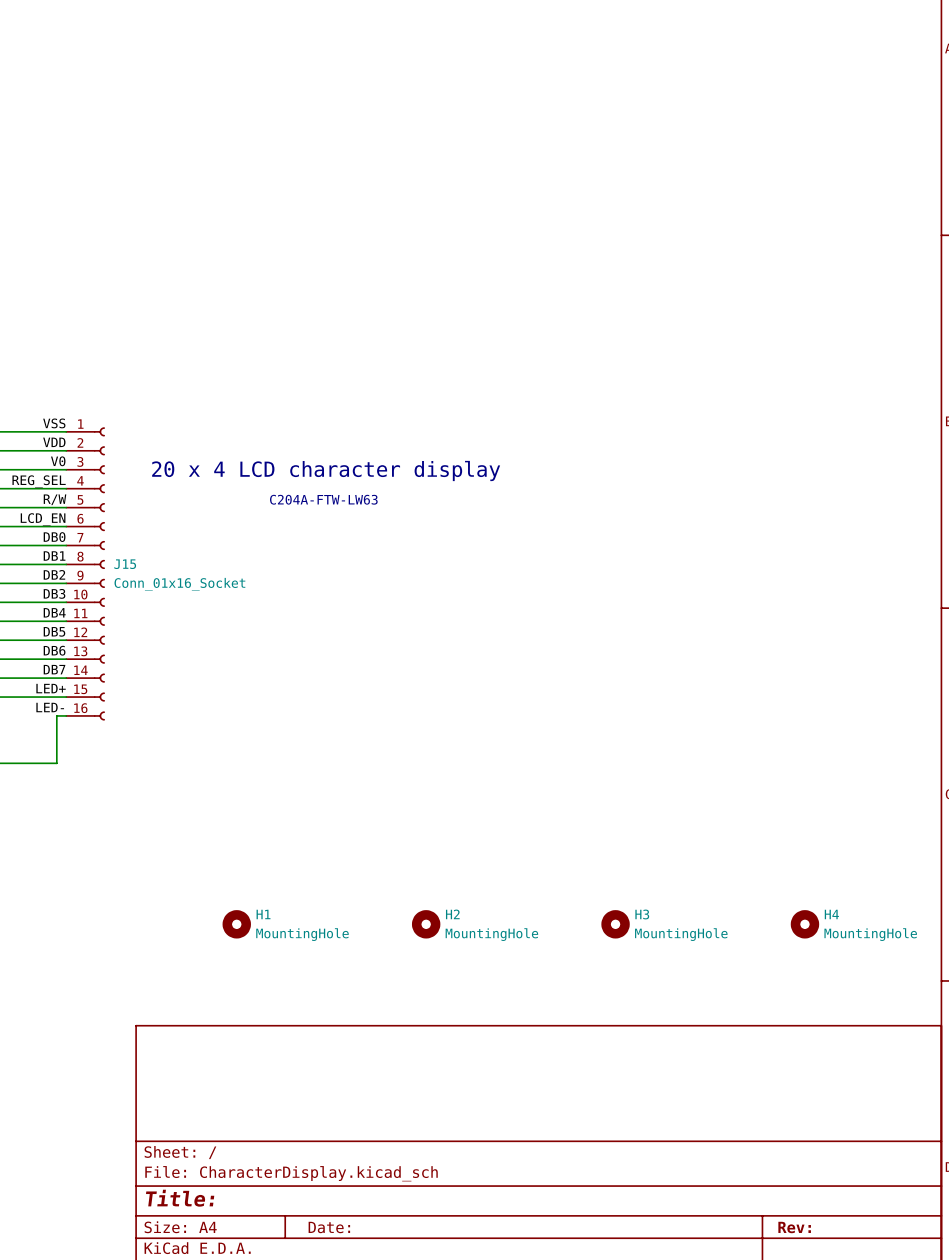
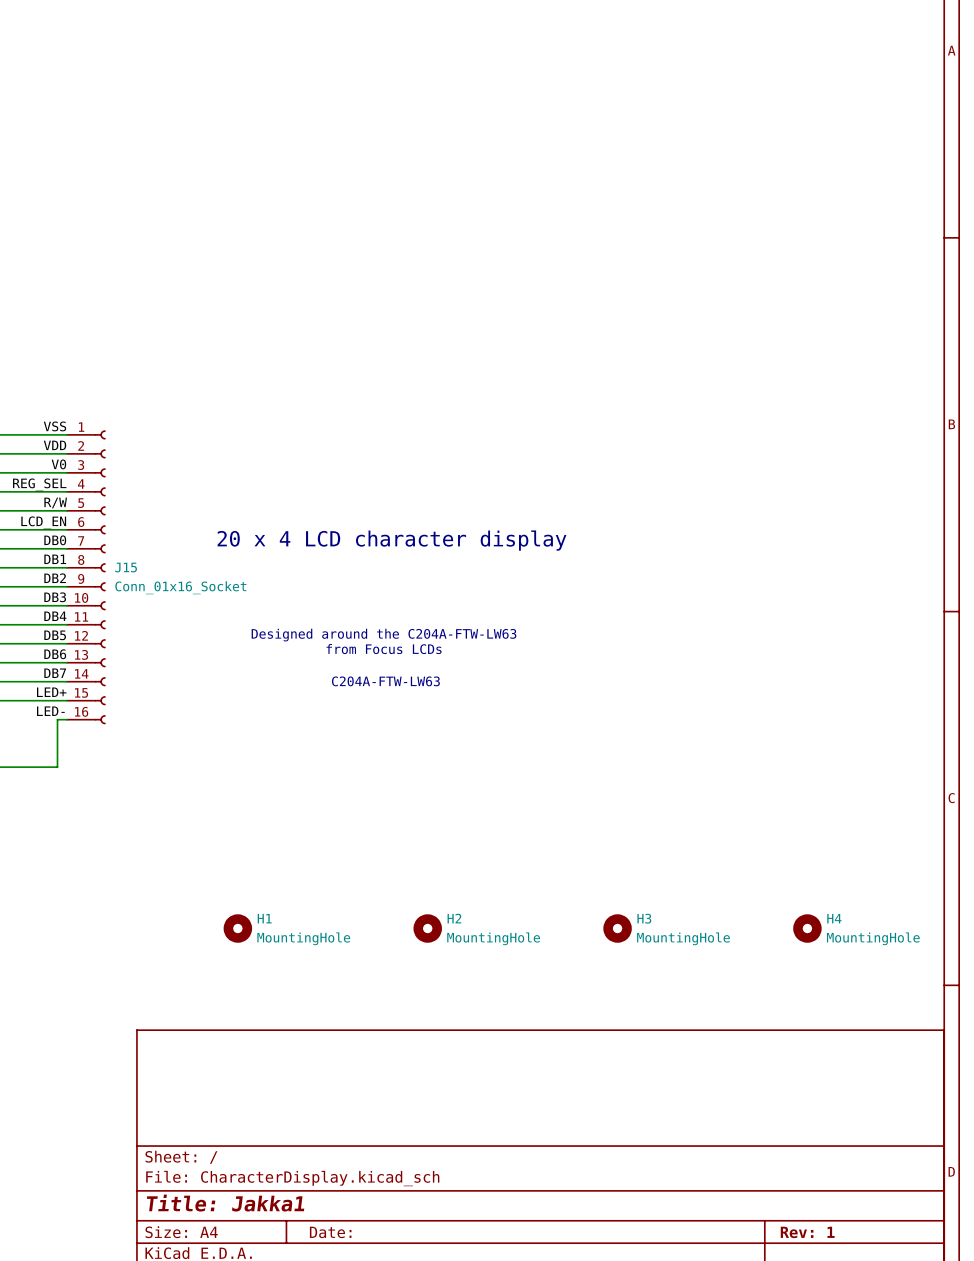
text position: 20 x 4 LCD character display (326, 470) -> 20 x 4 LCD character display (392, 540)
text: C204A-FTW-LW63 (323, 499) -> none
text: none -> Designed around the C204A-FTW-LW63 (384, 635)
text: none -> from Focus LCDs (384, 649)
text: none -> C204A-FTW-LW63 (385, 681)
title block: Title: (180, 1198) -> Title: Jakka1 (225, 1203)
title block: Rev: (794, 1227) -> Rev: 1 (807, 1232)

